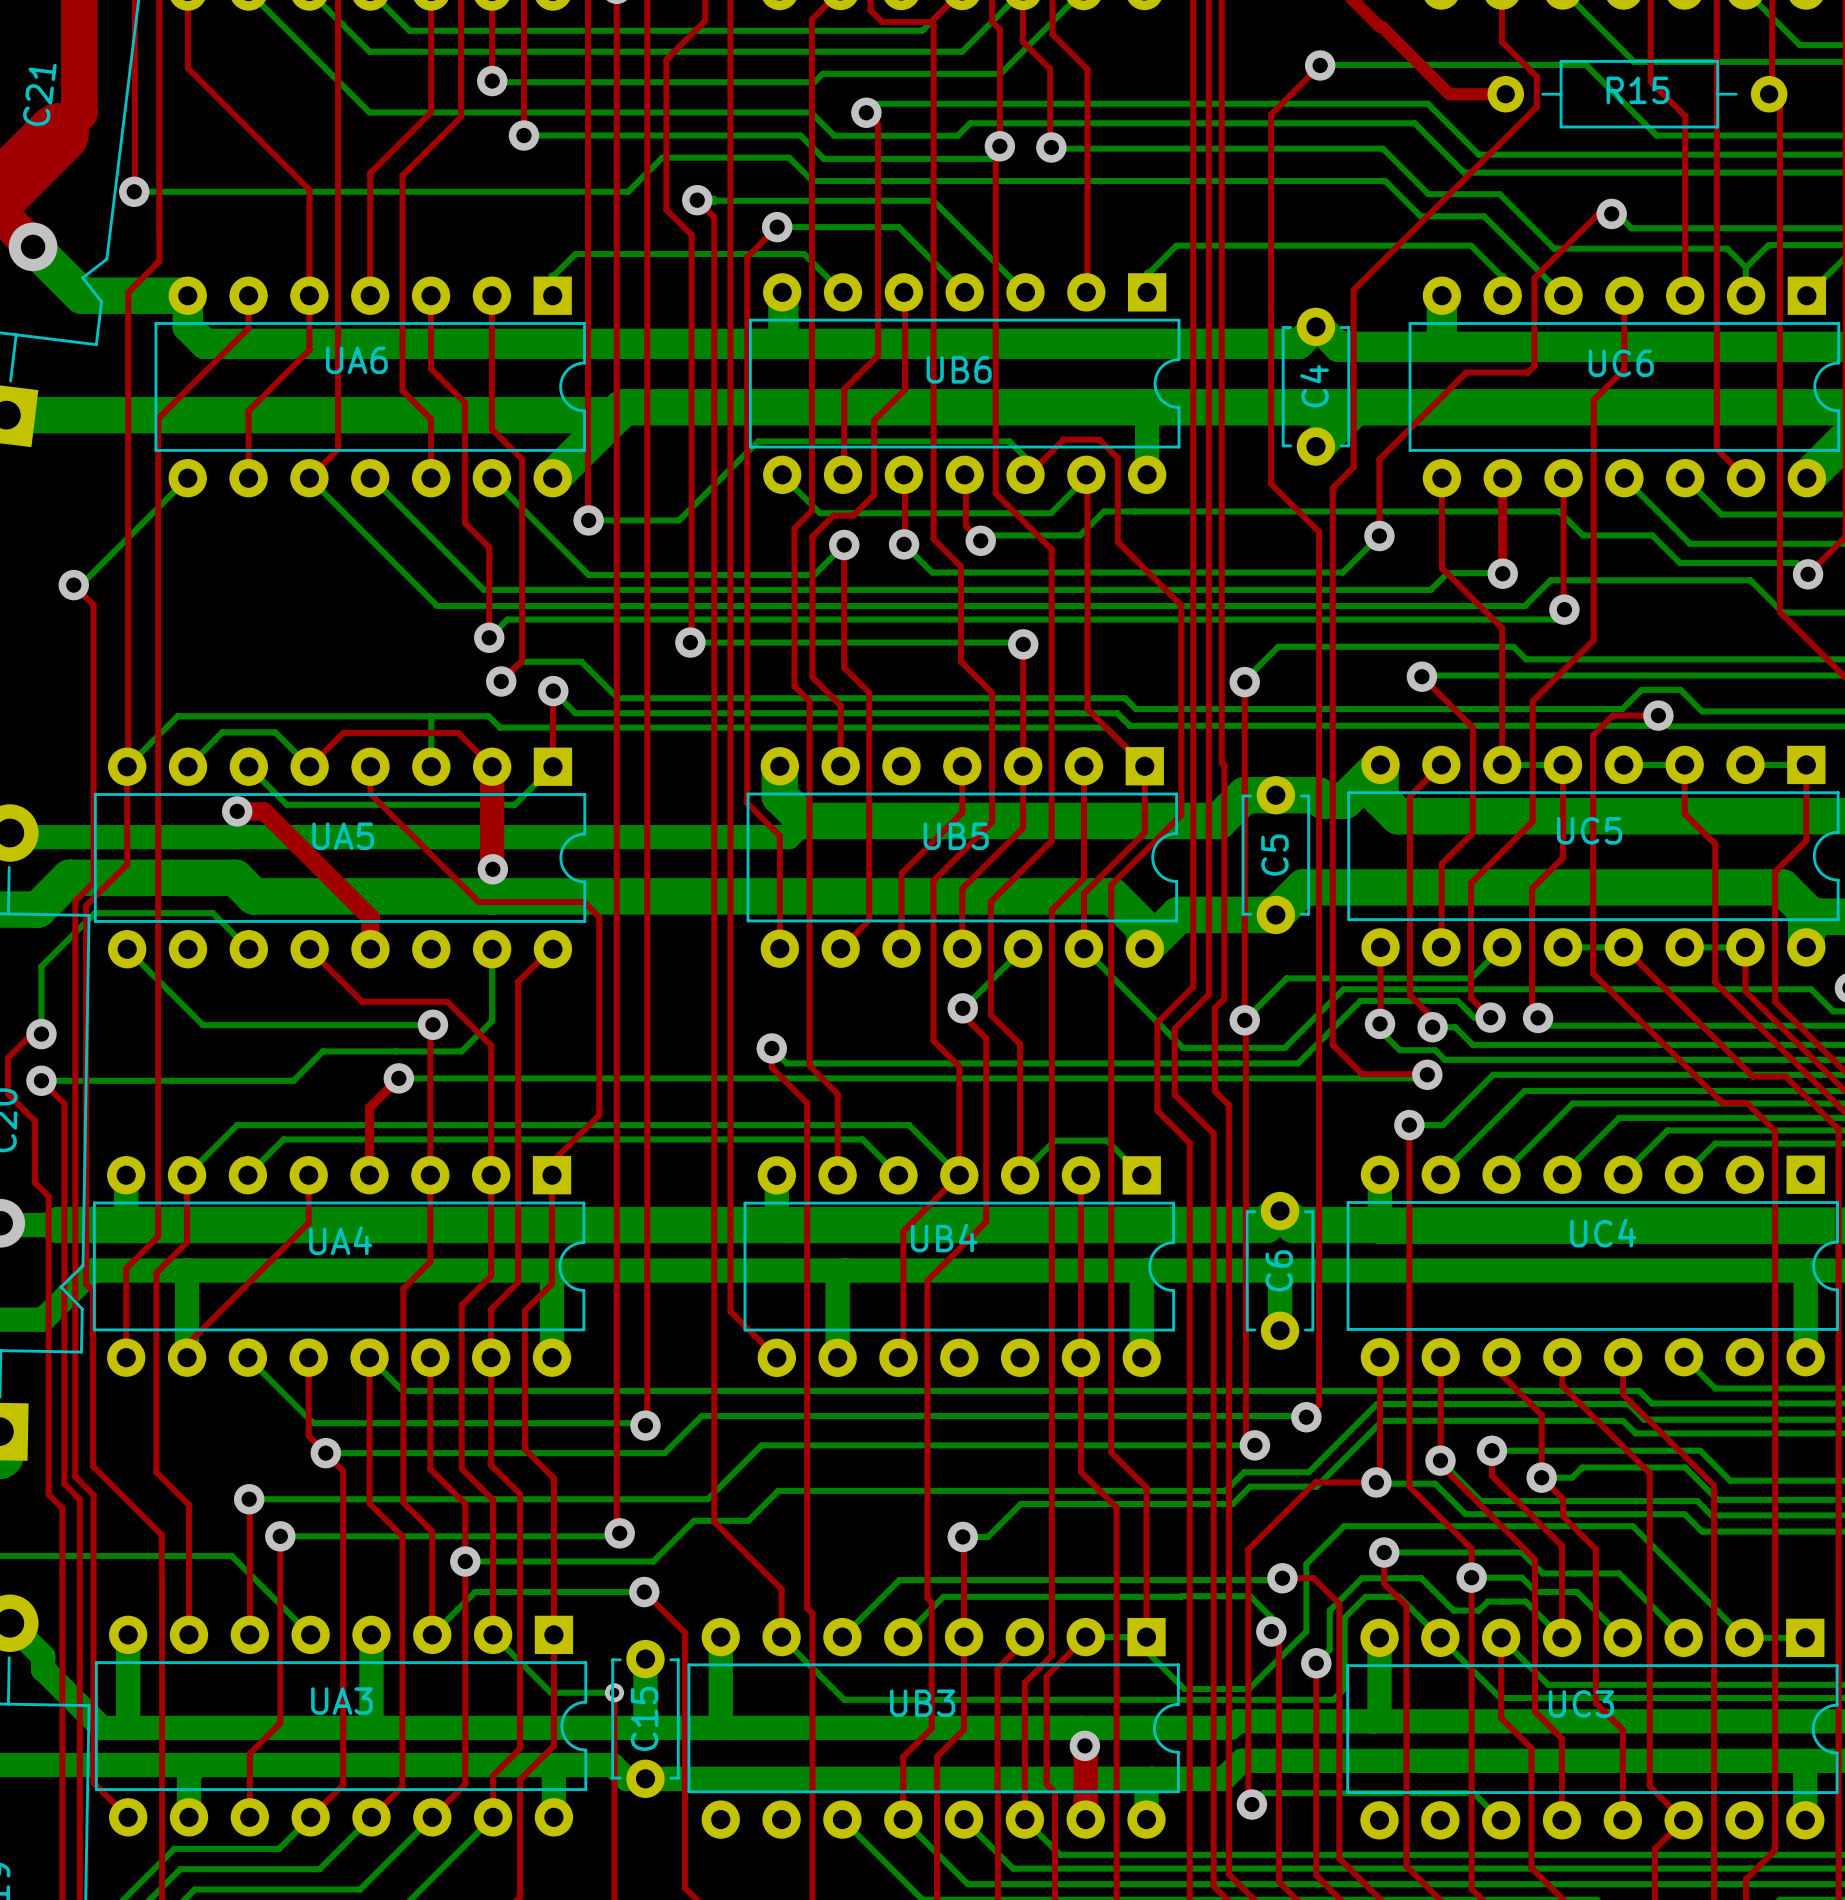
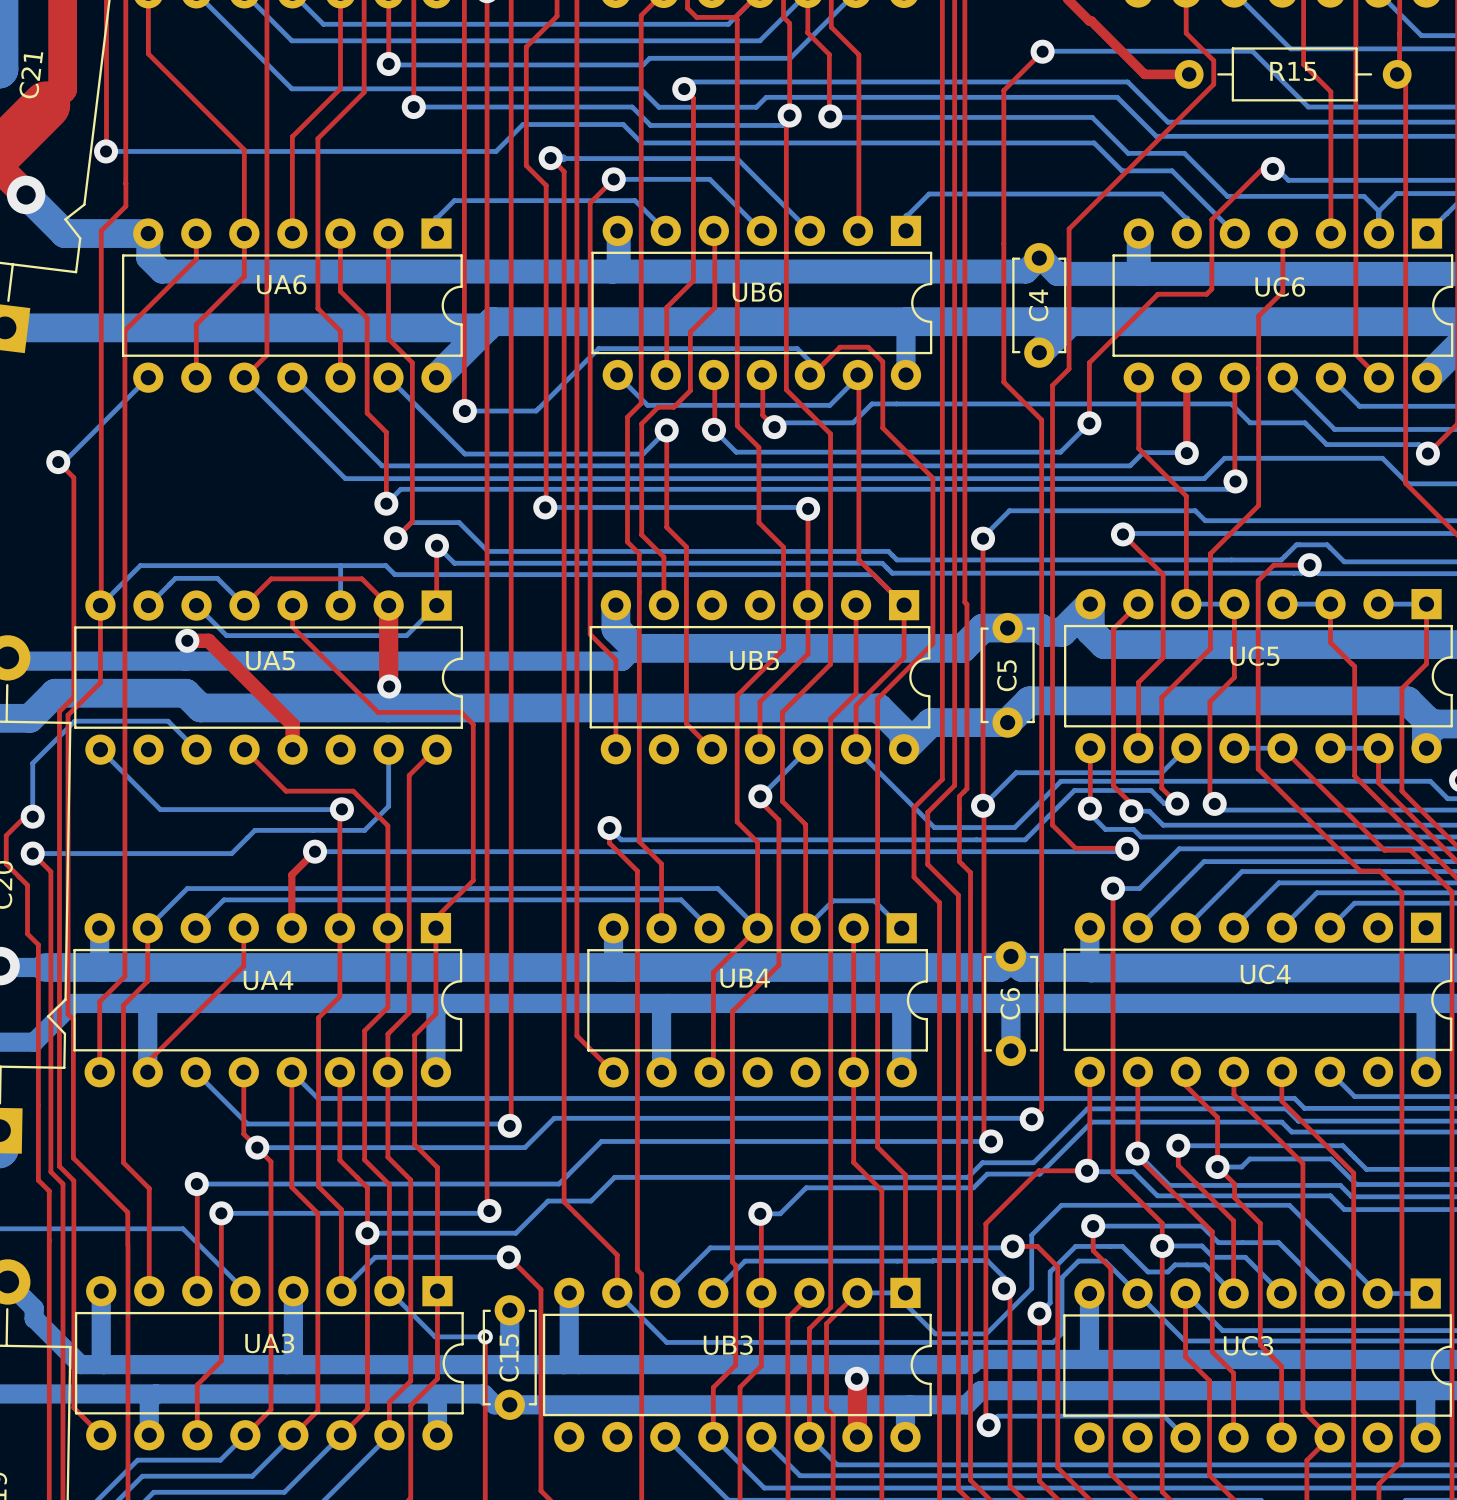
top track: (962, 766) (962, 812) (901, 873) (901, 948) -> none
top track: (869, 916) (869, 920) (840, 948) -> (686, 723) (711, 749)

